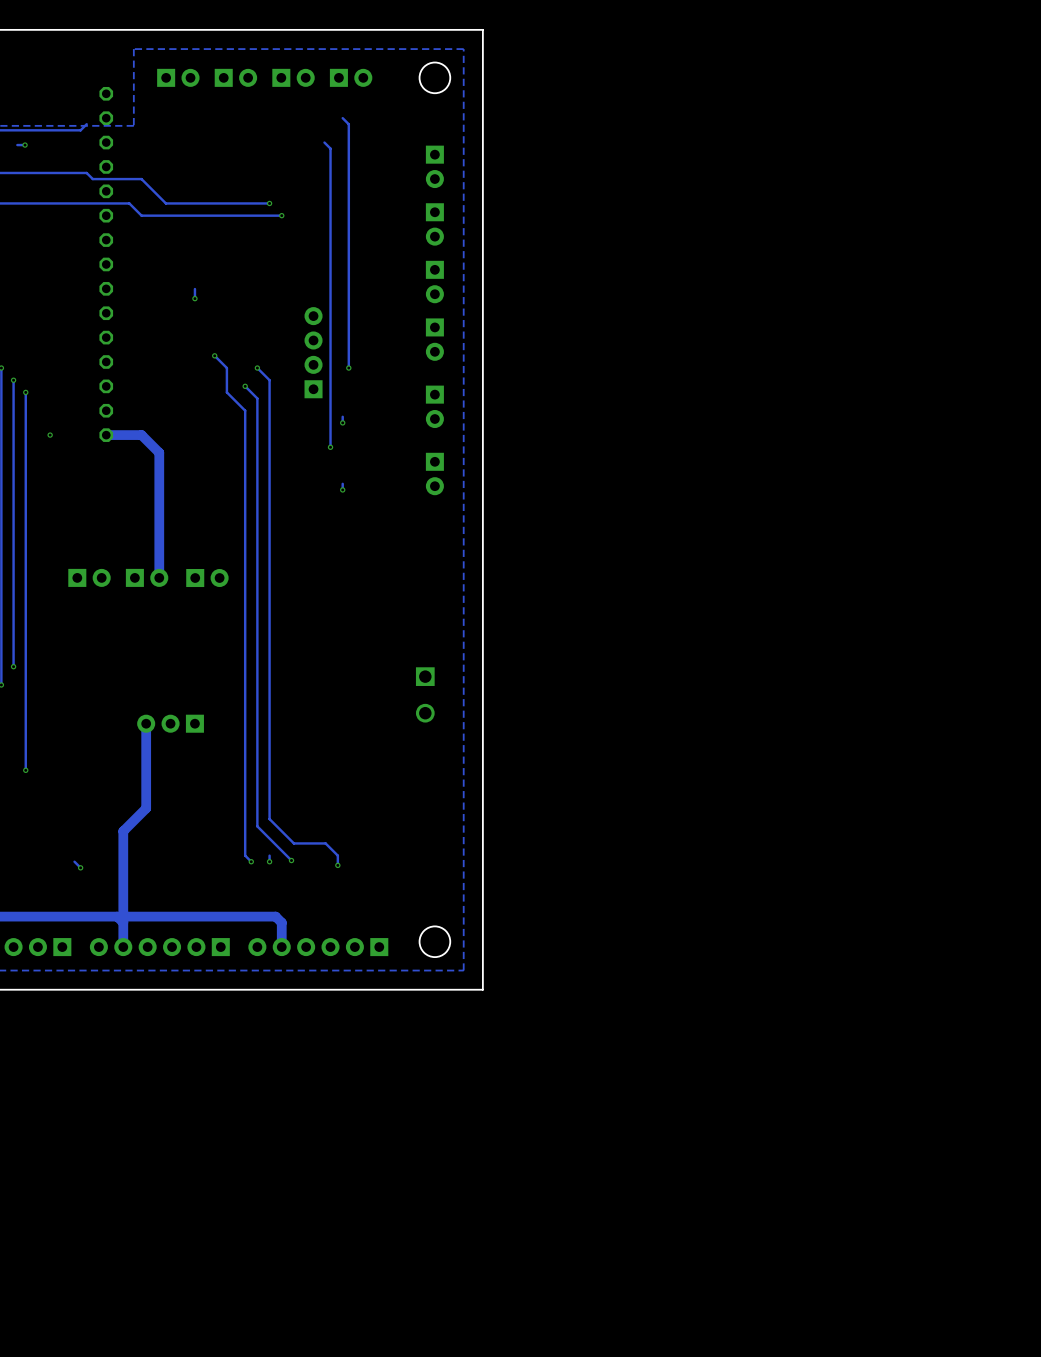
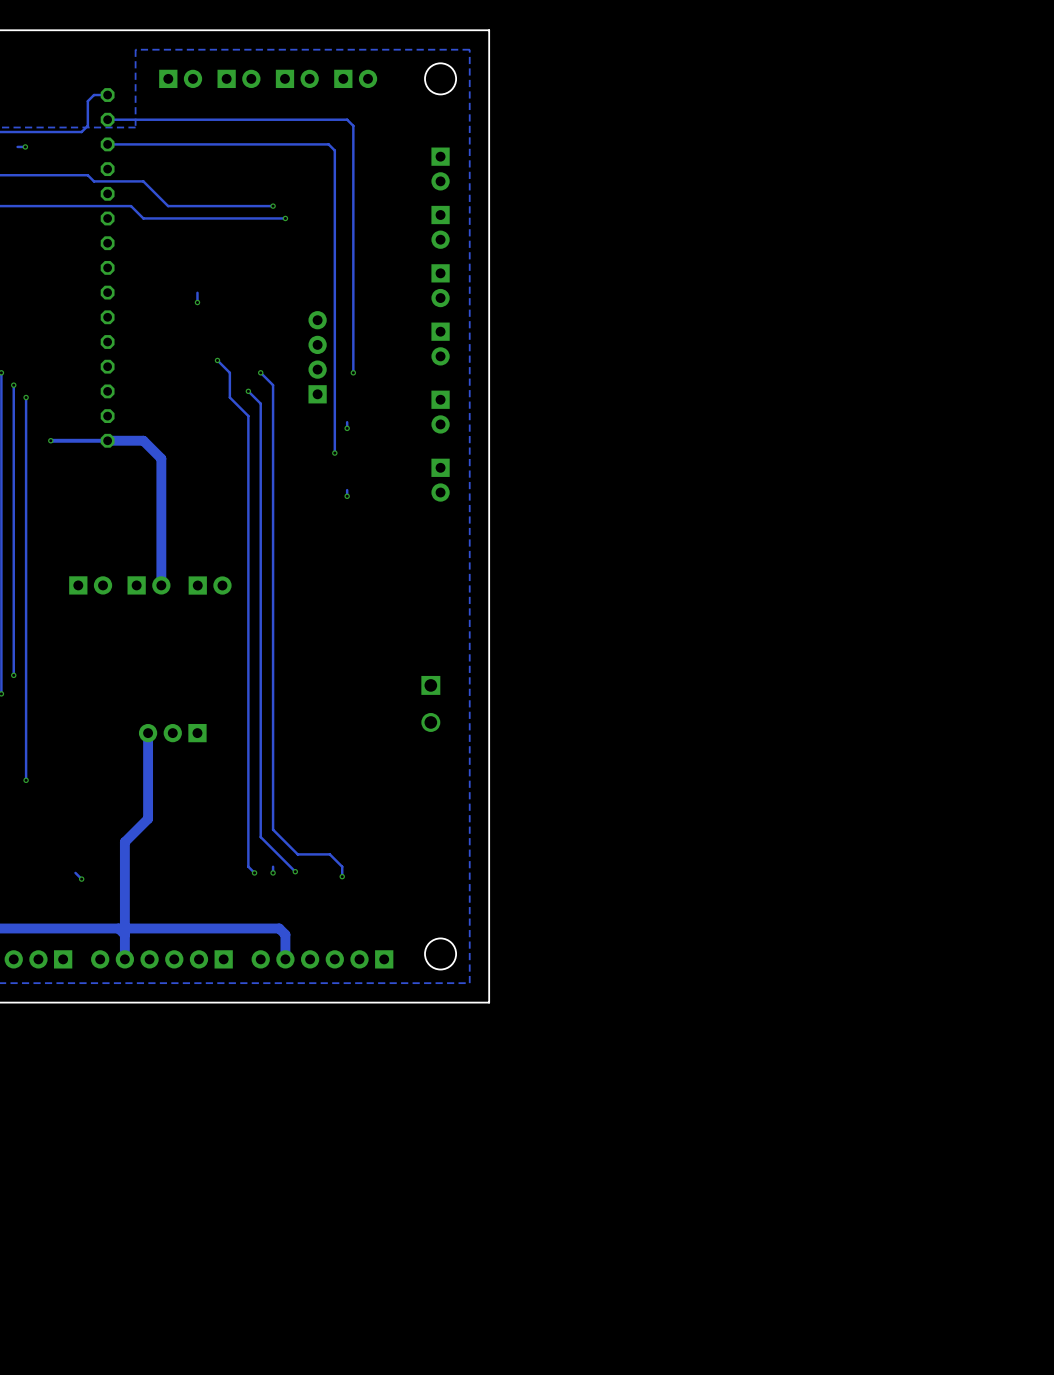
track: none -> (107, 95) (94, 95) (87, 101) (87, 125)
track: none -> (347, 119) (107, 119)
track: none -> (328, 144) (107, 144)
track: none -> (107, 440) (50, 440)

